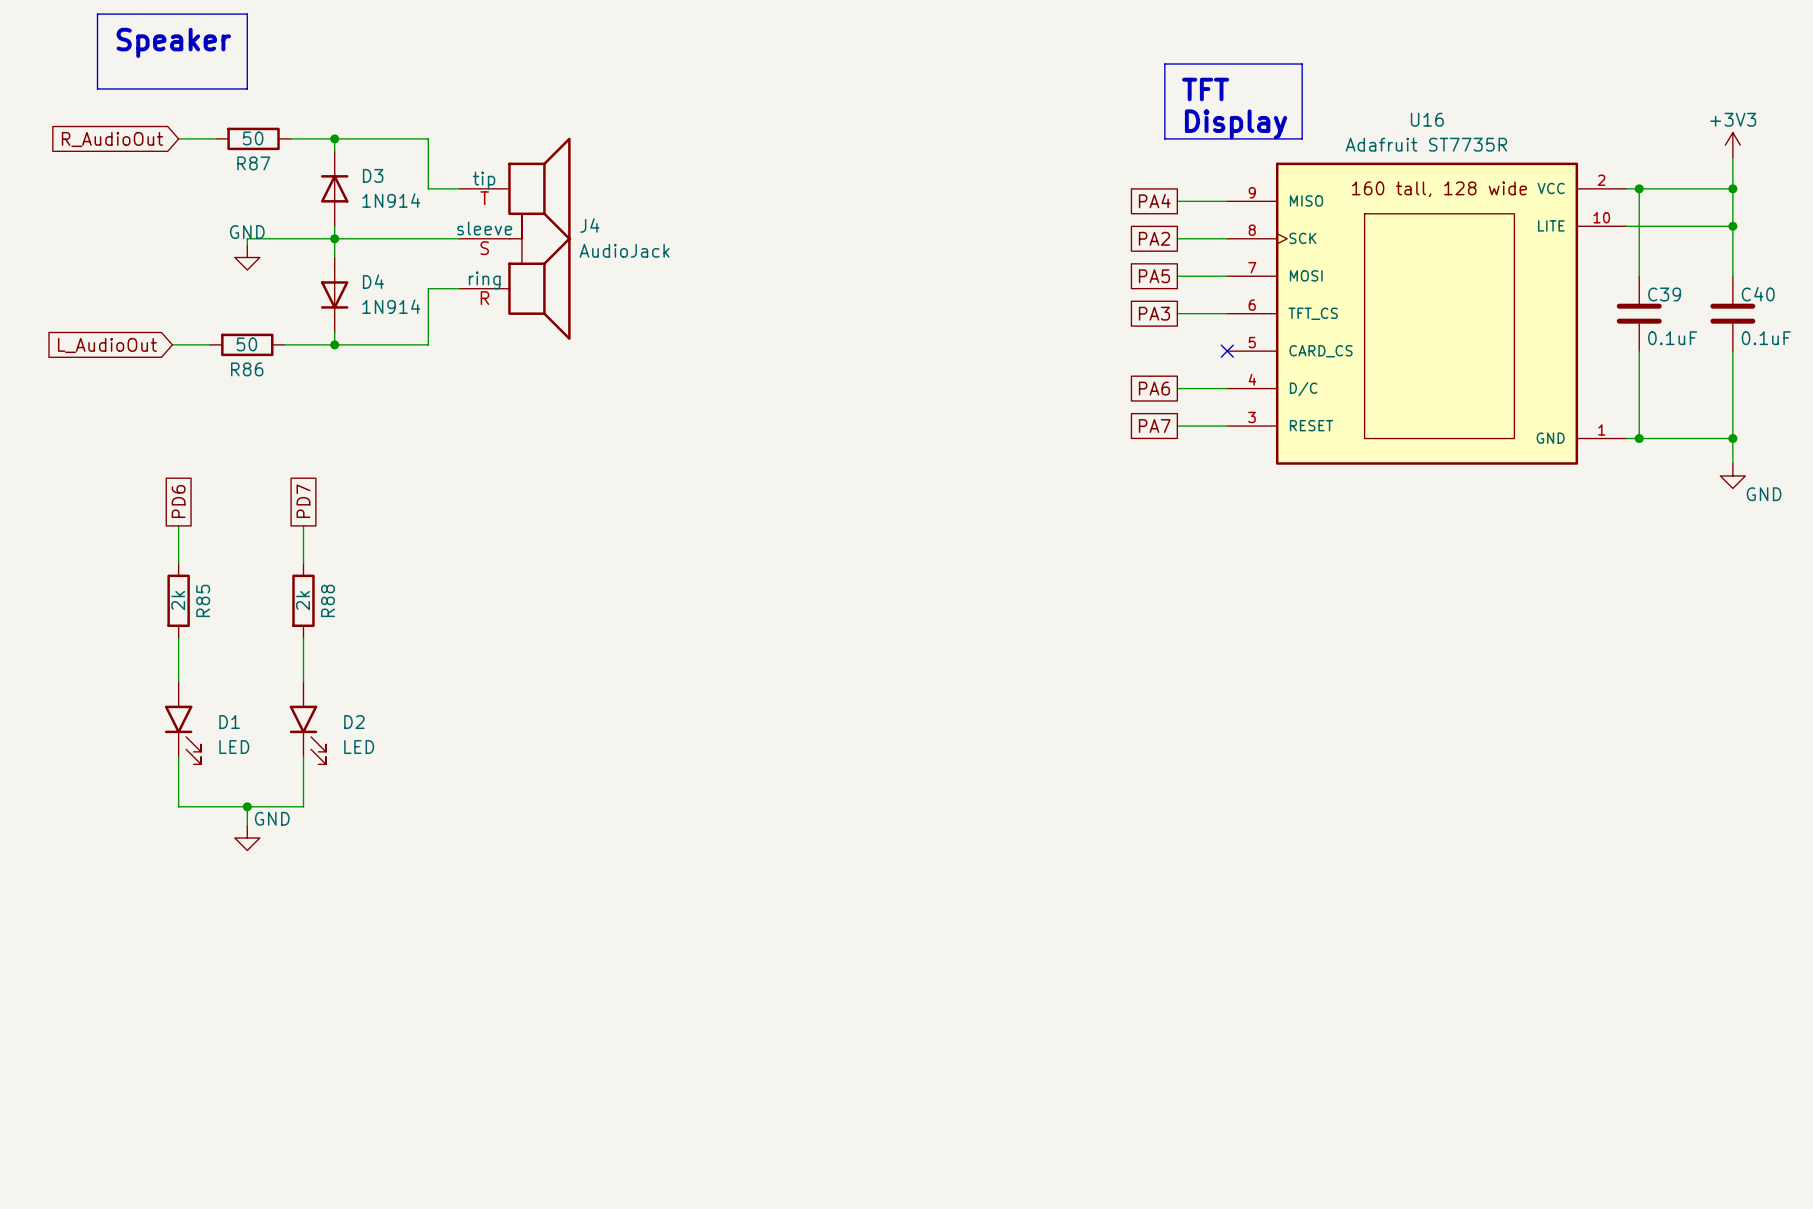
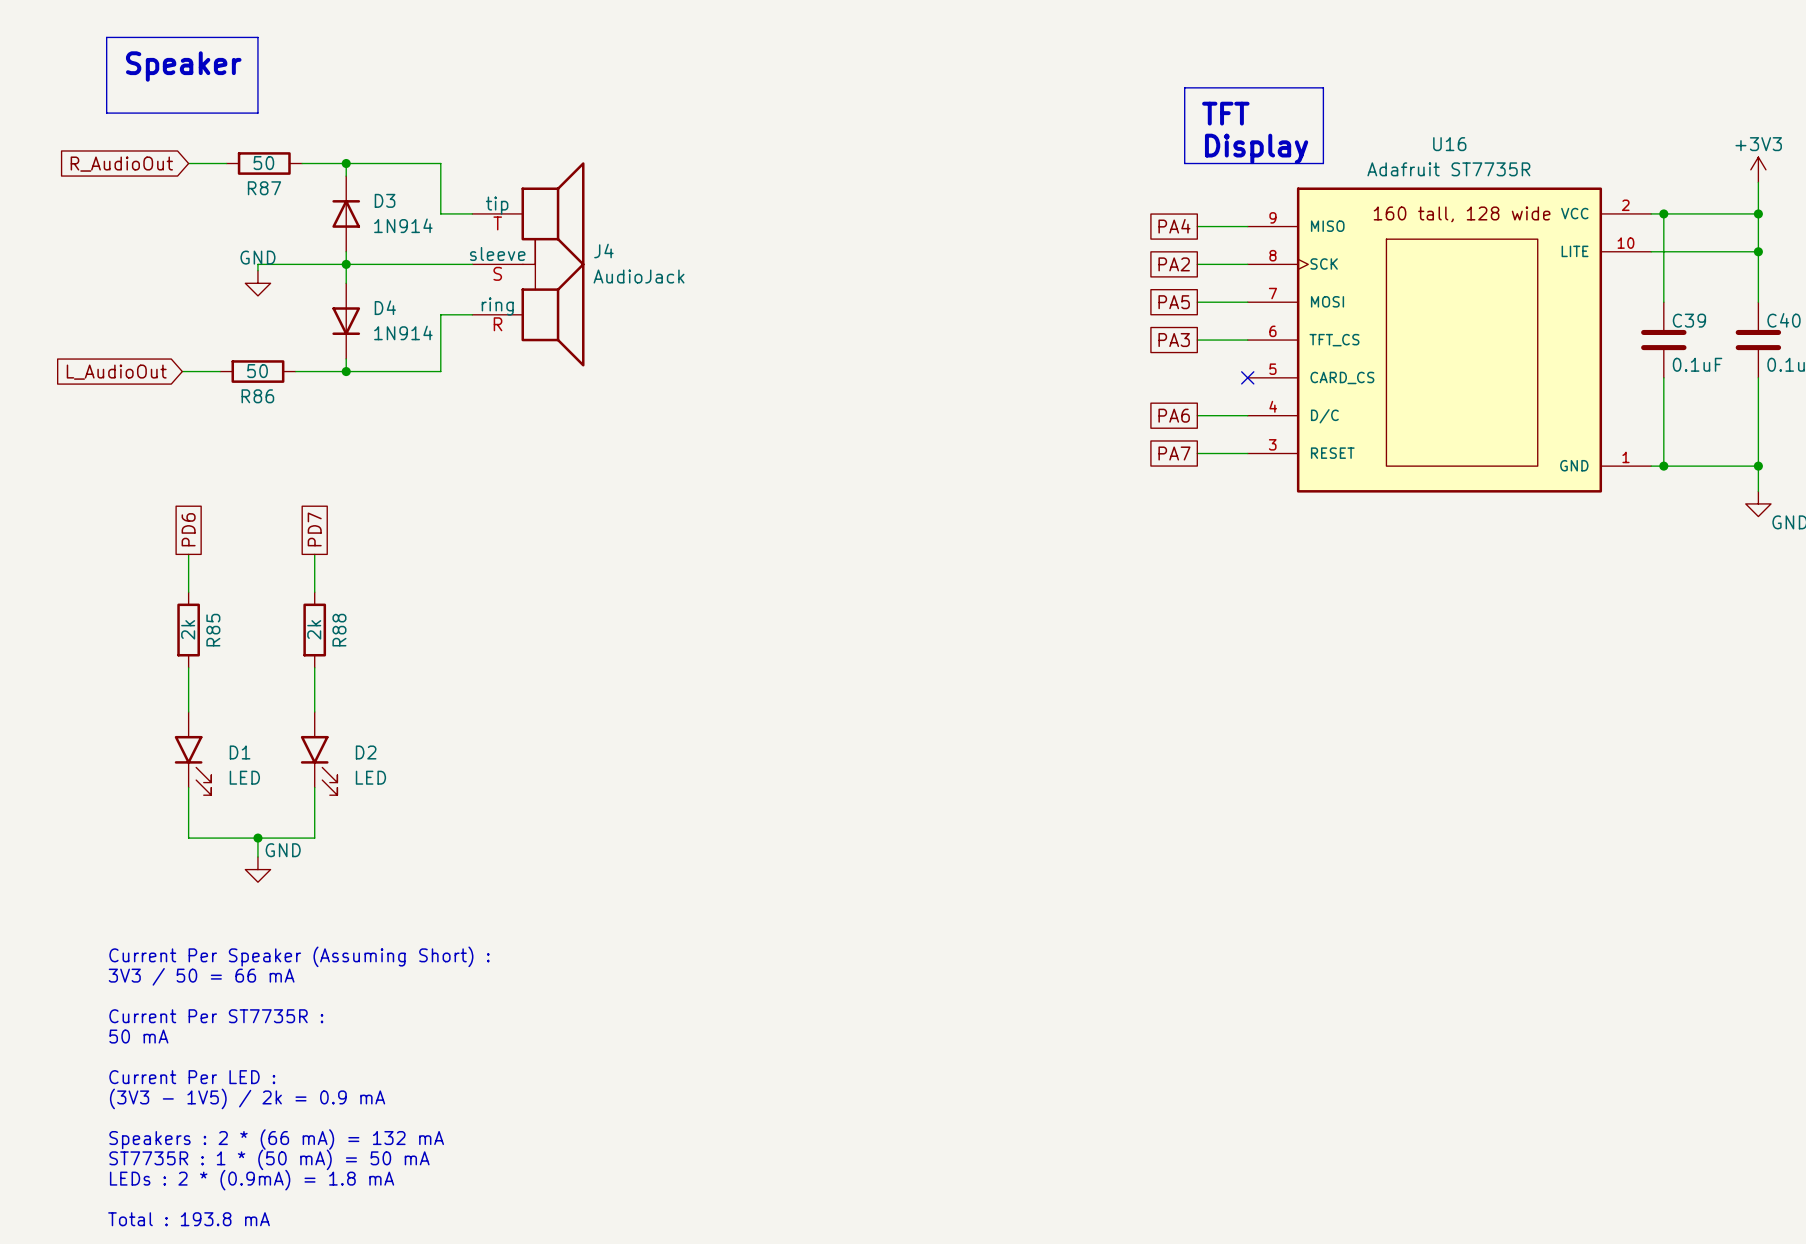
text: none -> Current Per Speaker (Assuming Short) : (299, 956)
text: none -> 3V3 / 50 = 66 mA (201, 976)
text: none -> Current Per ST7735R : (216, 1016)
text: none -> 50 mA (138, 1036)
text: none -> Current Per LED : (192, 1077)
text: none -> (3V3 - 1V5) / 2k = 0.9 mA (247, 1098)
text: none -> Speakers : 2 * (66 mA) = 132 mA (276, 1139)
text: none -> ST7735R : 1 * (50 mA) = 50 mA (269, 1159)
text: none -> LEDs : 2 * (0.9mA) = 1.8 mA (252, 1180)
text: none -> Total : 193.8 mA (189, 1219)

